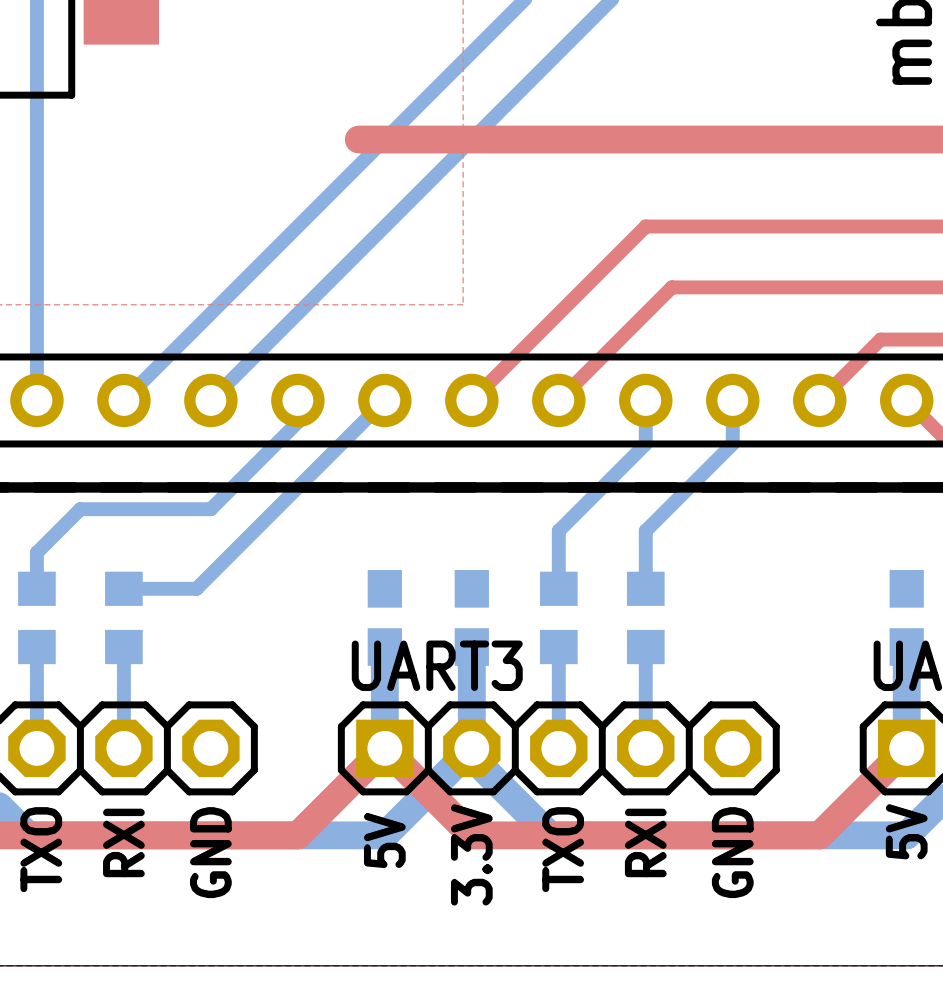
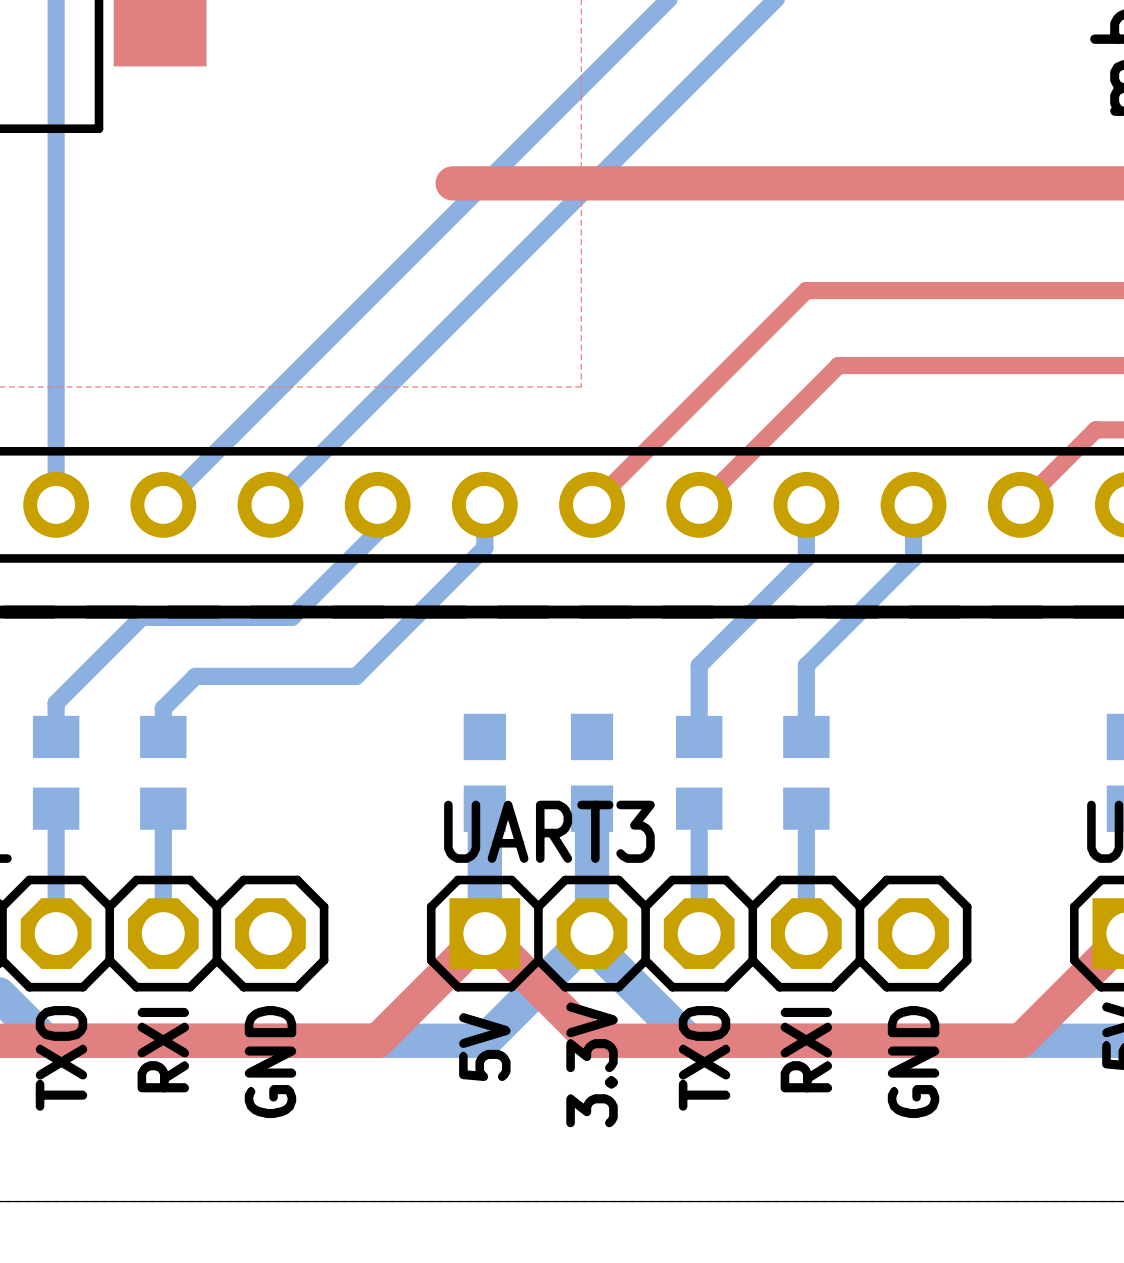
bottom track: (384, 400) (196, 588) (123, 588) -> (484, 504) (484, 547) (356, 676) (195, 676) (163, 708) (163, 736)
bottom track: (228, 491) (210, 509) (80, 509) (36, 552) (36, 561) -> (291, 617) (141, 617) (56, 703)

